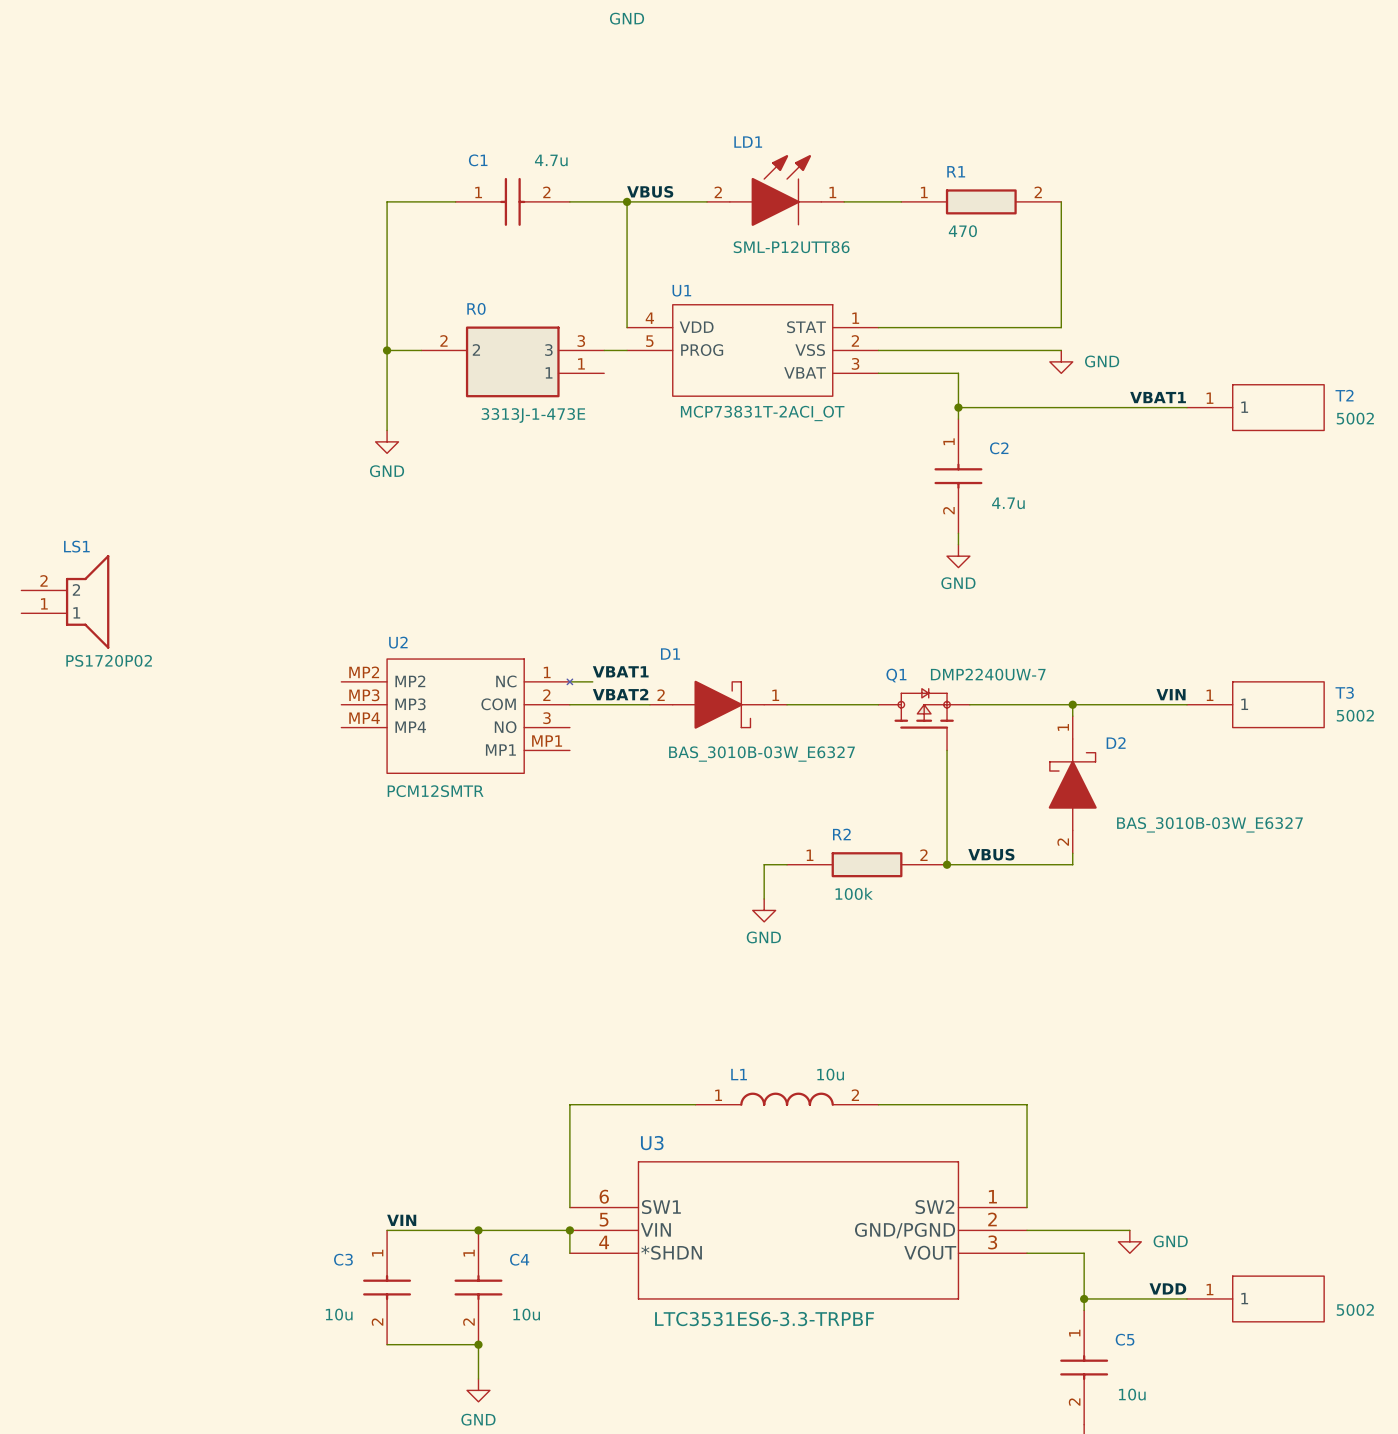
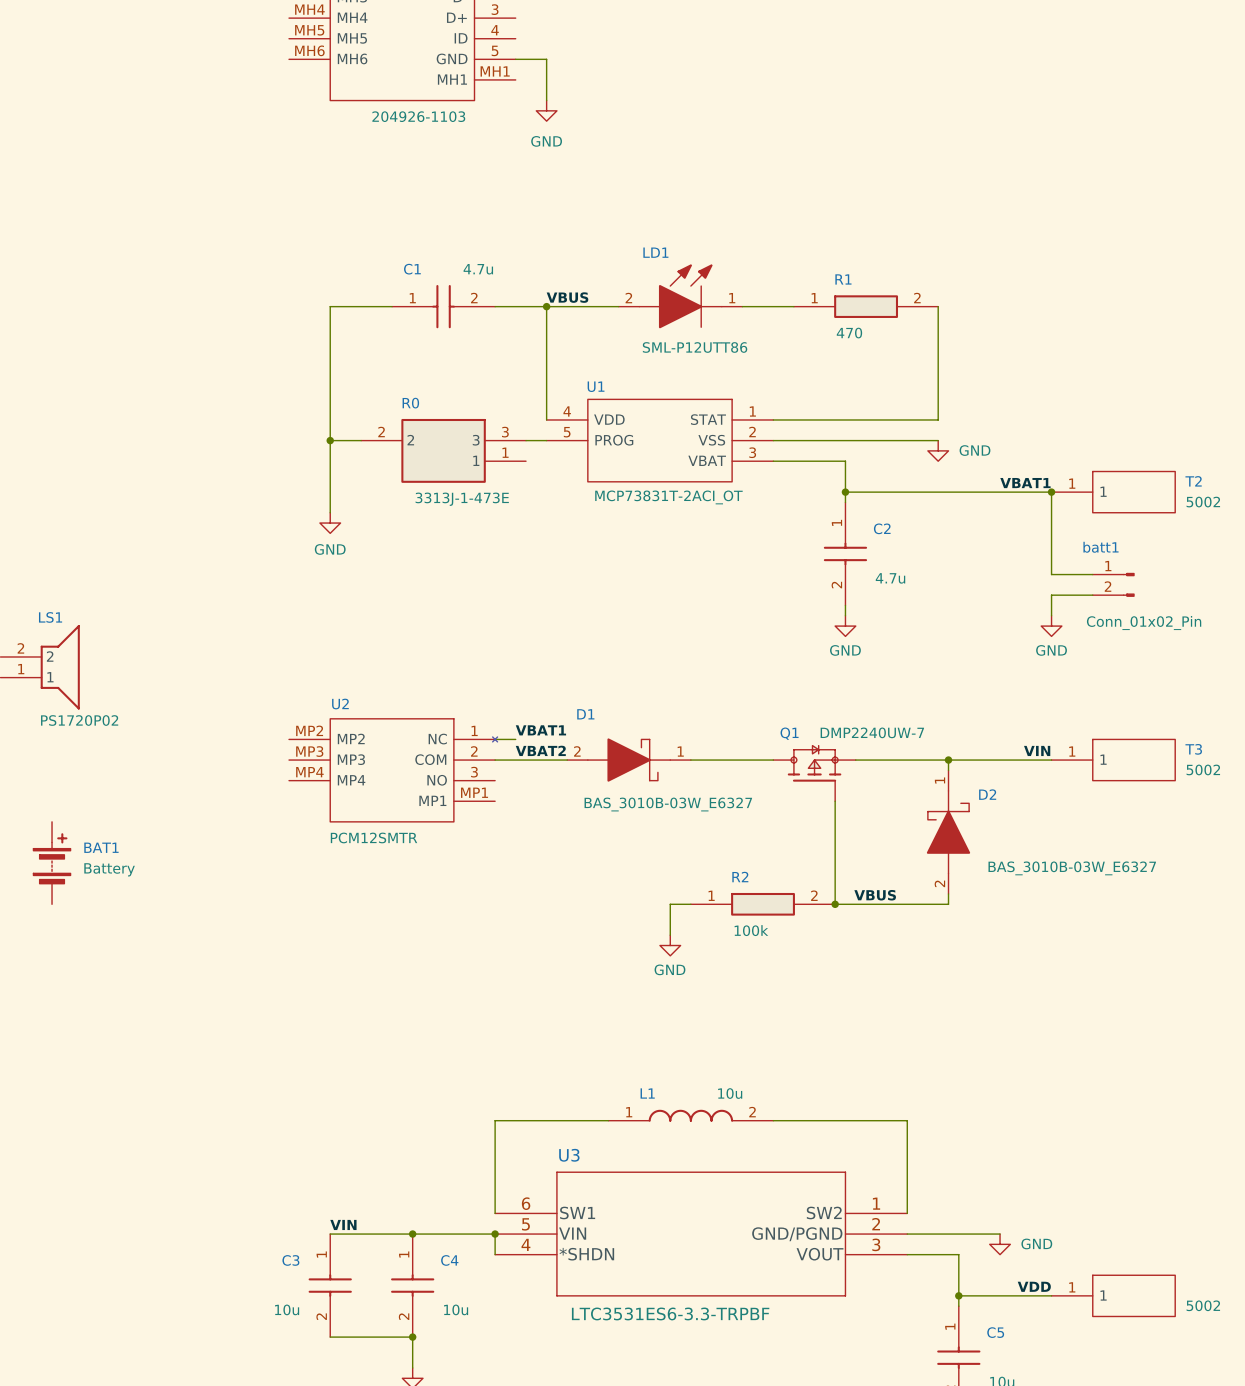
wire: none -> (1051, 492) (1051, 574) (1092, 574)
junction: none -> (1051, 492)
batt1: none -> Conn_01x02_Pin (1113, 584)
wire: none -> (1092, 595) (1051, 595) (1051, 615)
power symbol: none -> GND (1051, 626)
BAT1: none -> Battery (52, 863)

